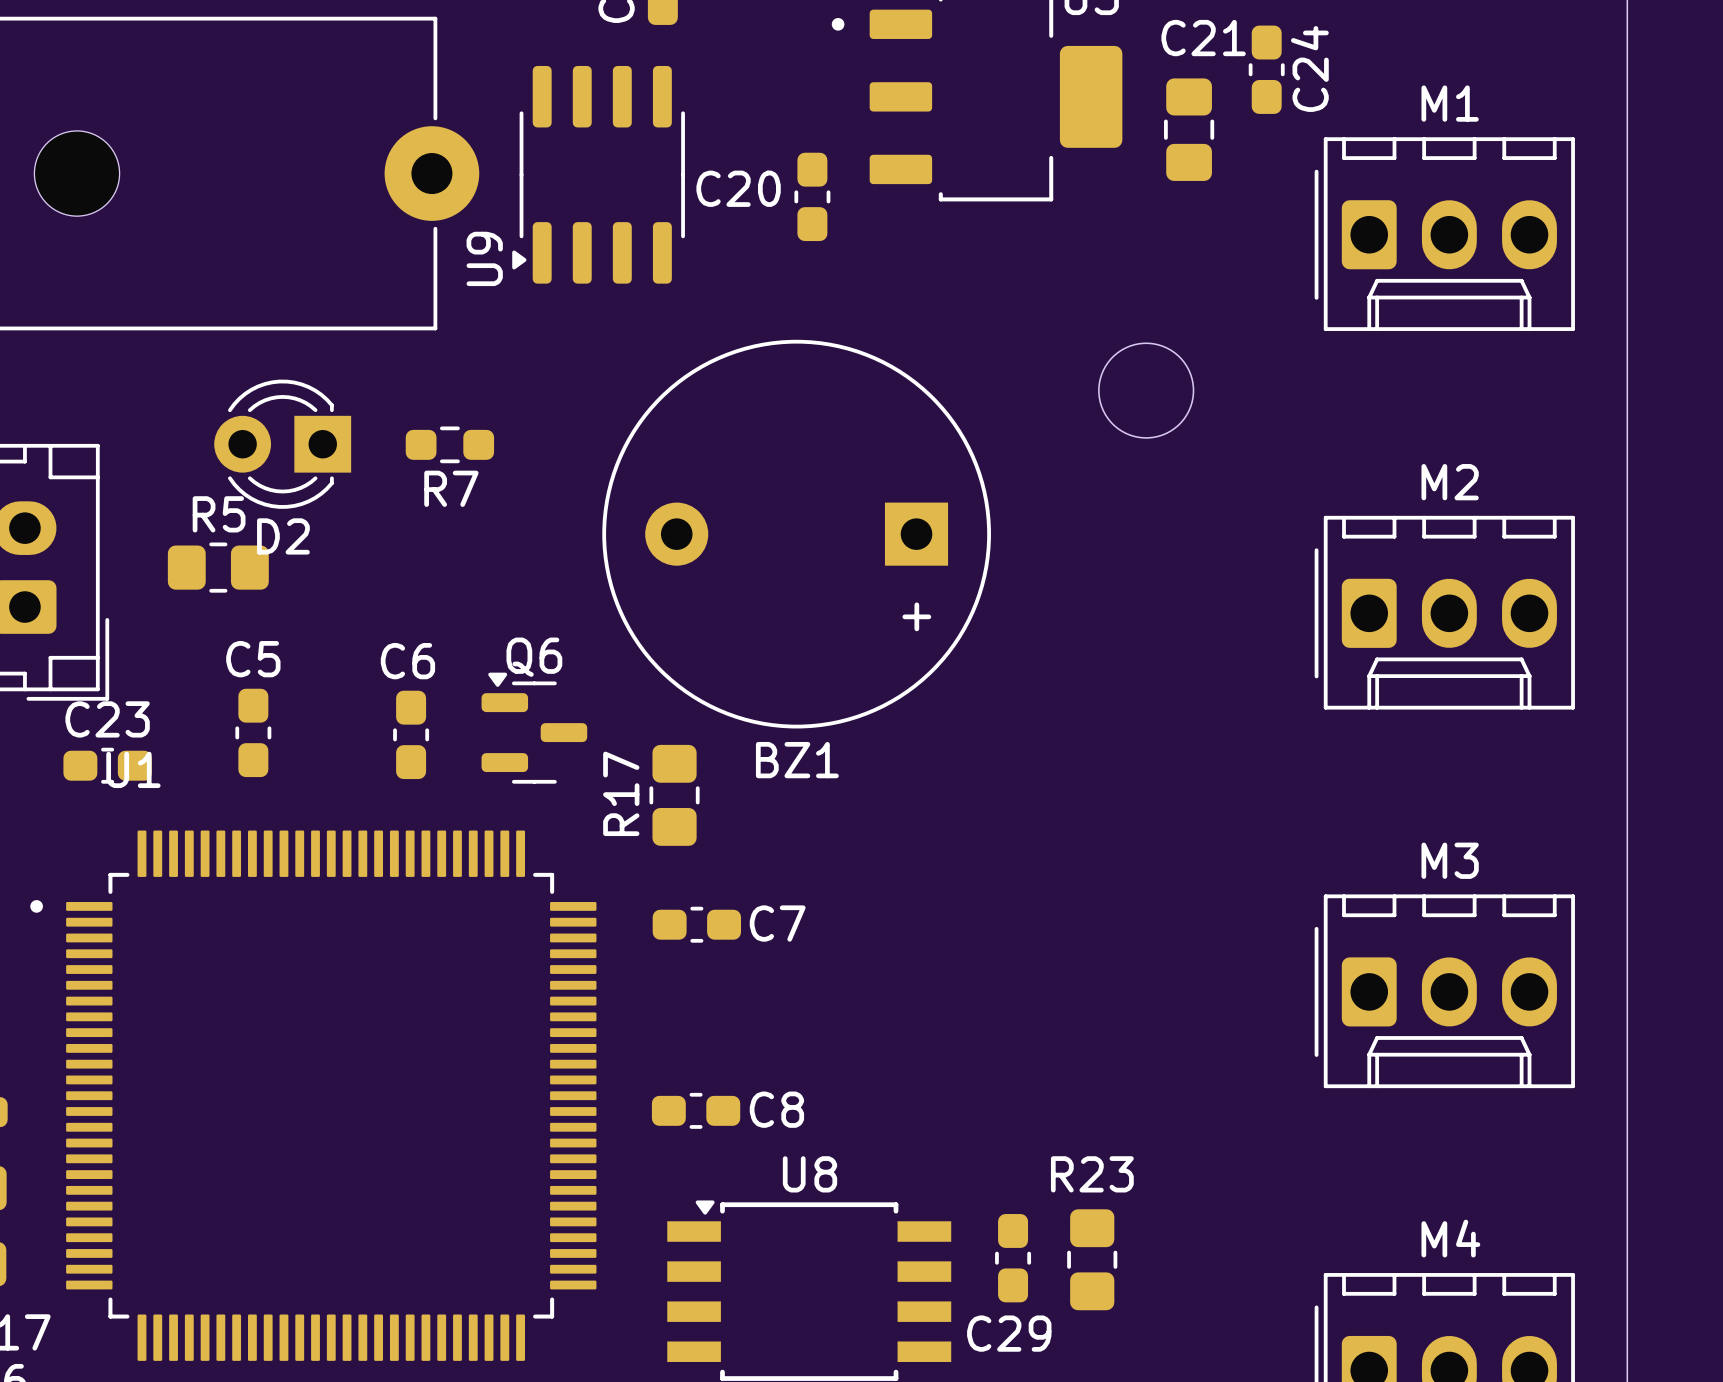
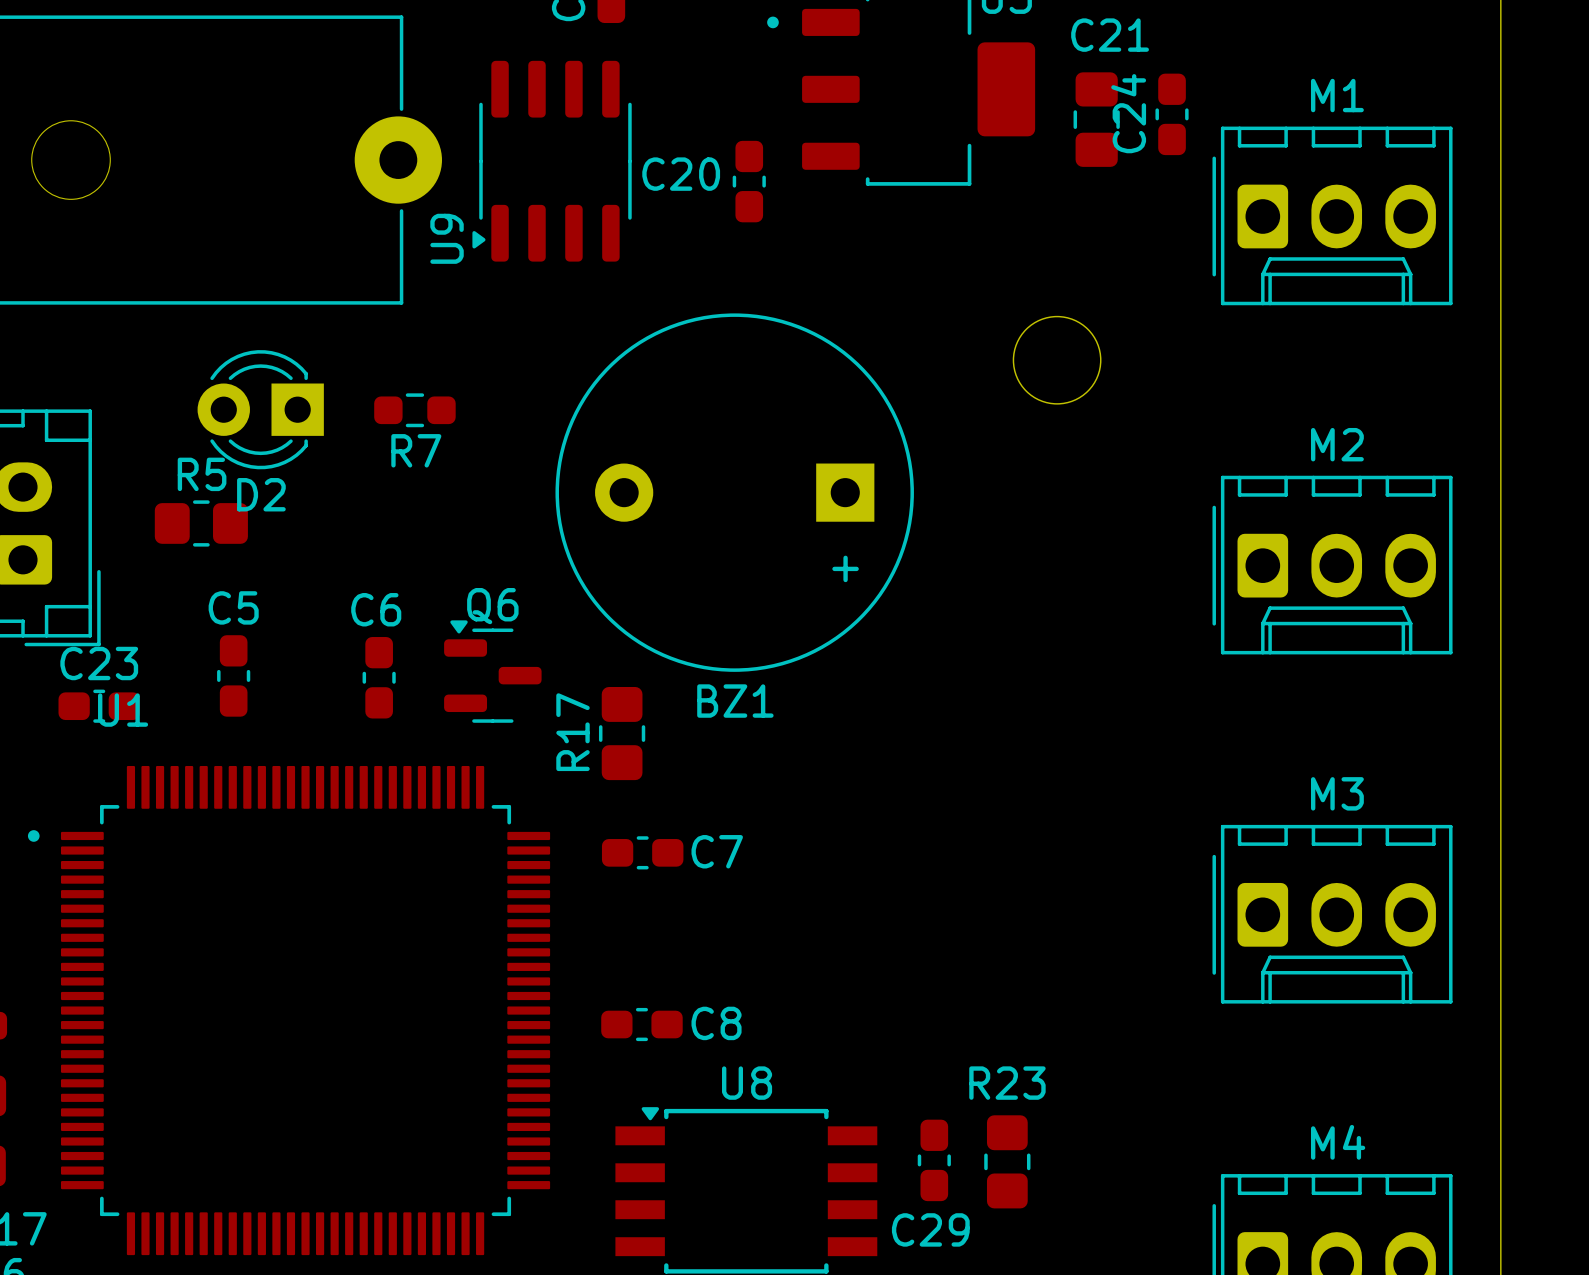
C24 name position: C24 (1309, 68) -> C24 (1128, 113)
C24 position: (1266, 69) -> (1172, 114)

